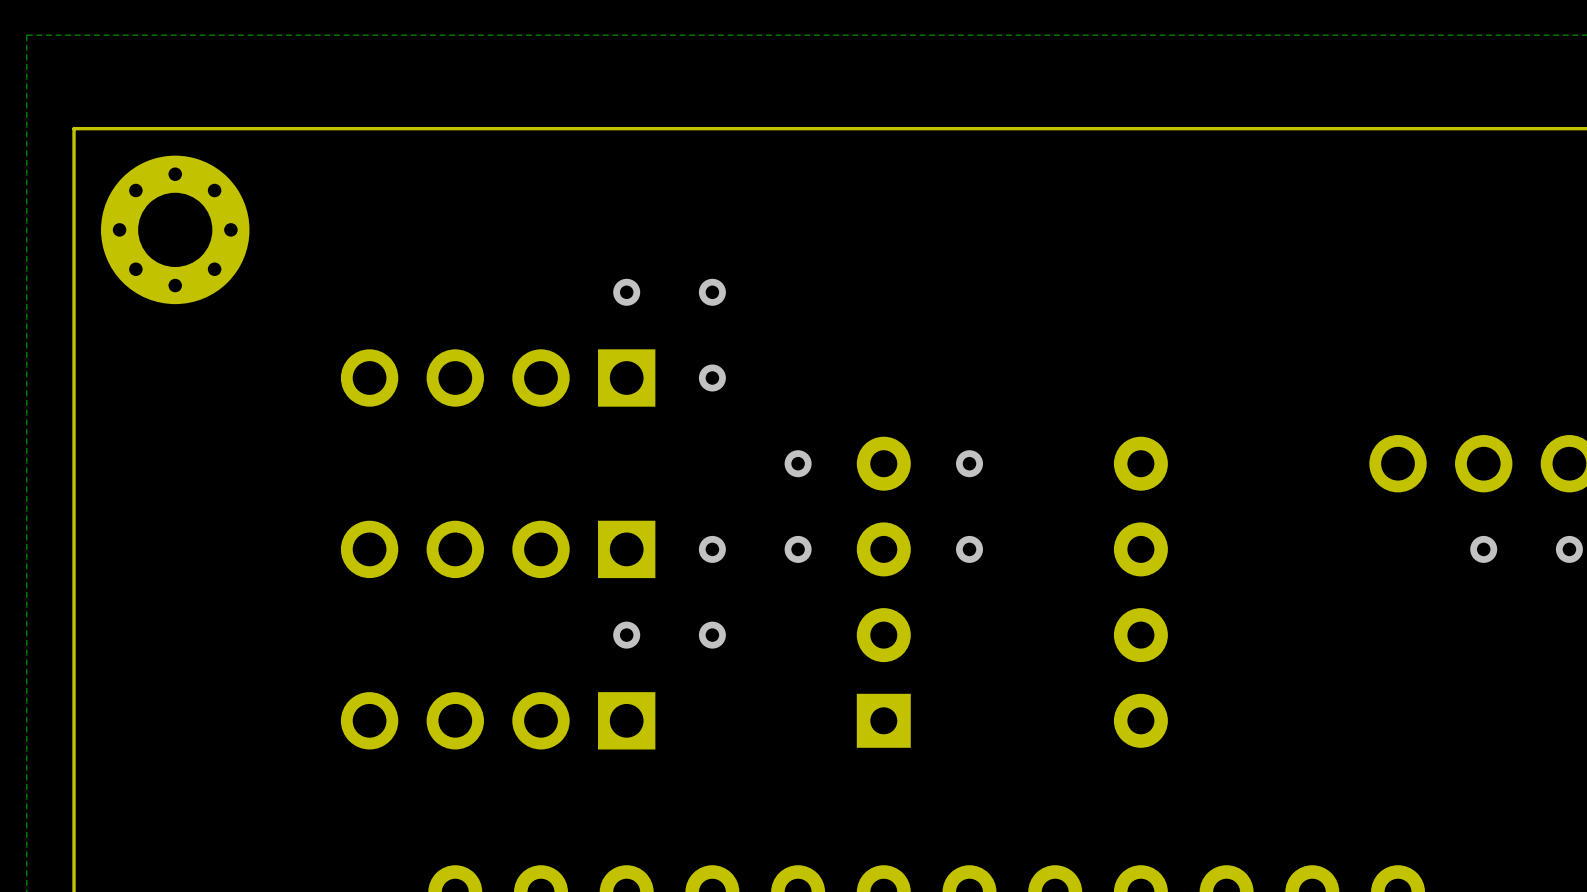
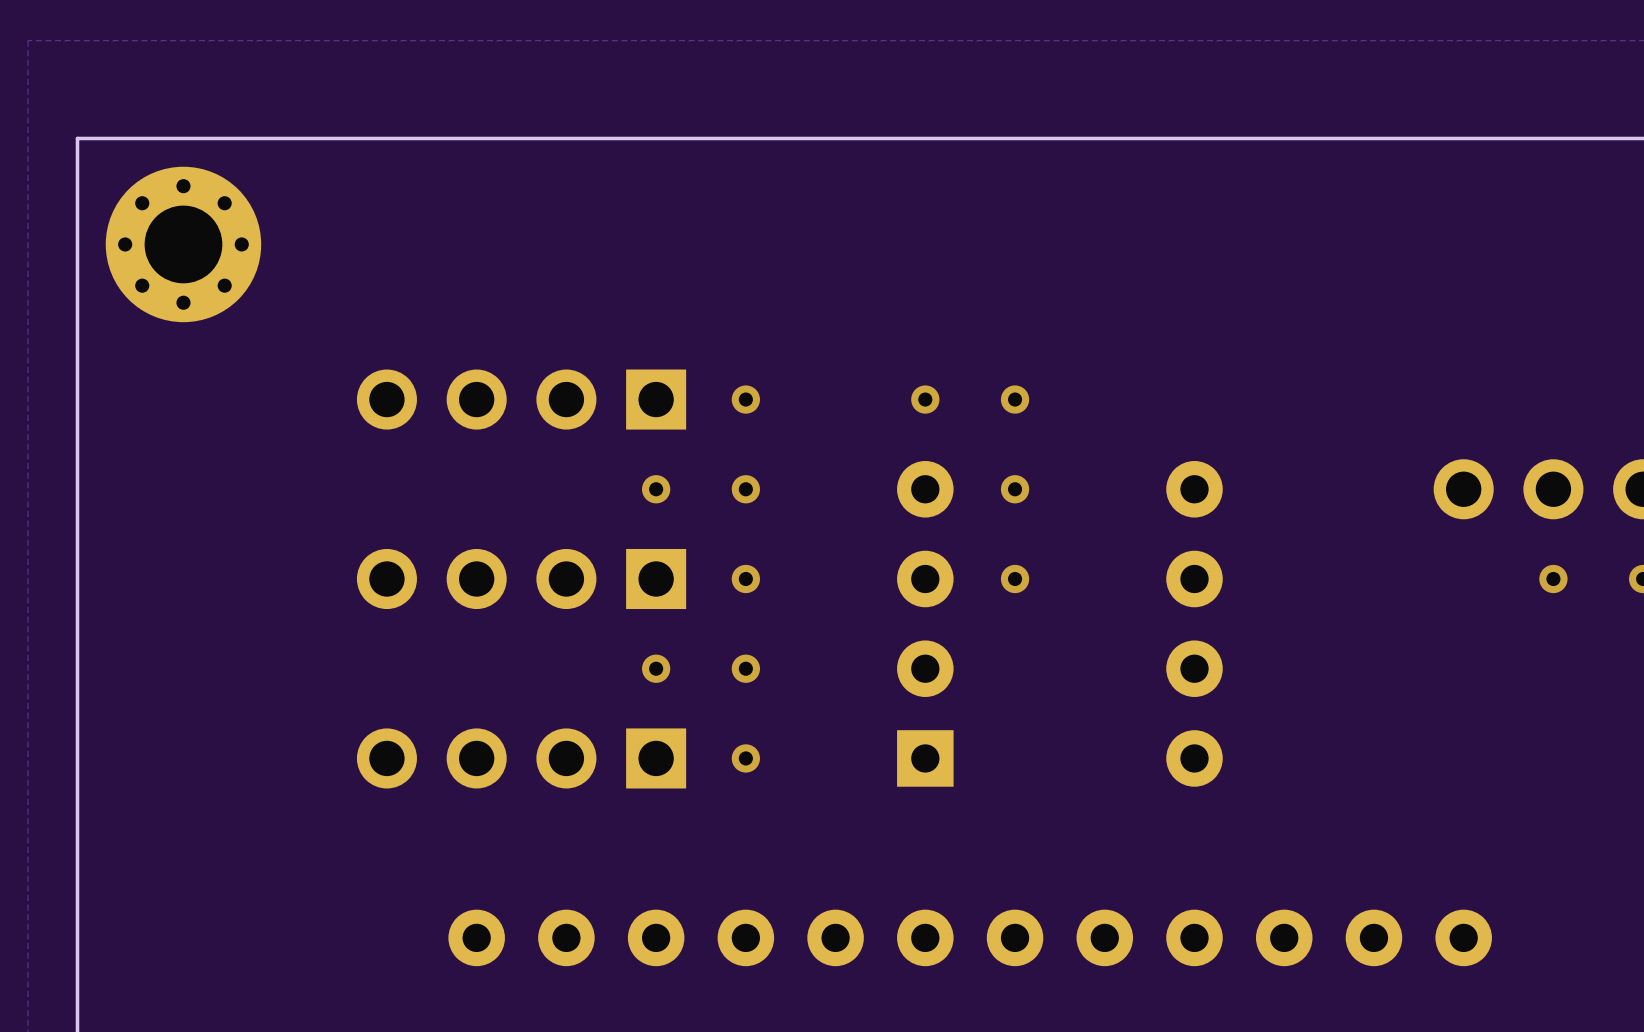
via: (626, 292) -> none
via: (712, 292) -> none
via: none -> (925, 399)
via: none -> (1015, 399)
via: none -> (656, 489)
via: none -> (745, 489)
via: (798, 463) -> none
via: (798, 549) -> none
via: none -> (745, 758)

